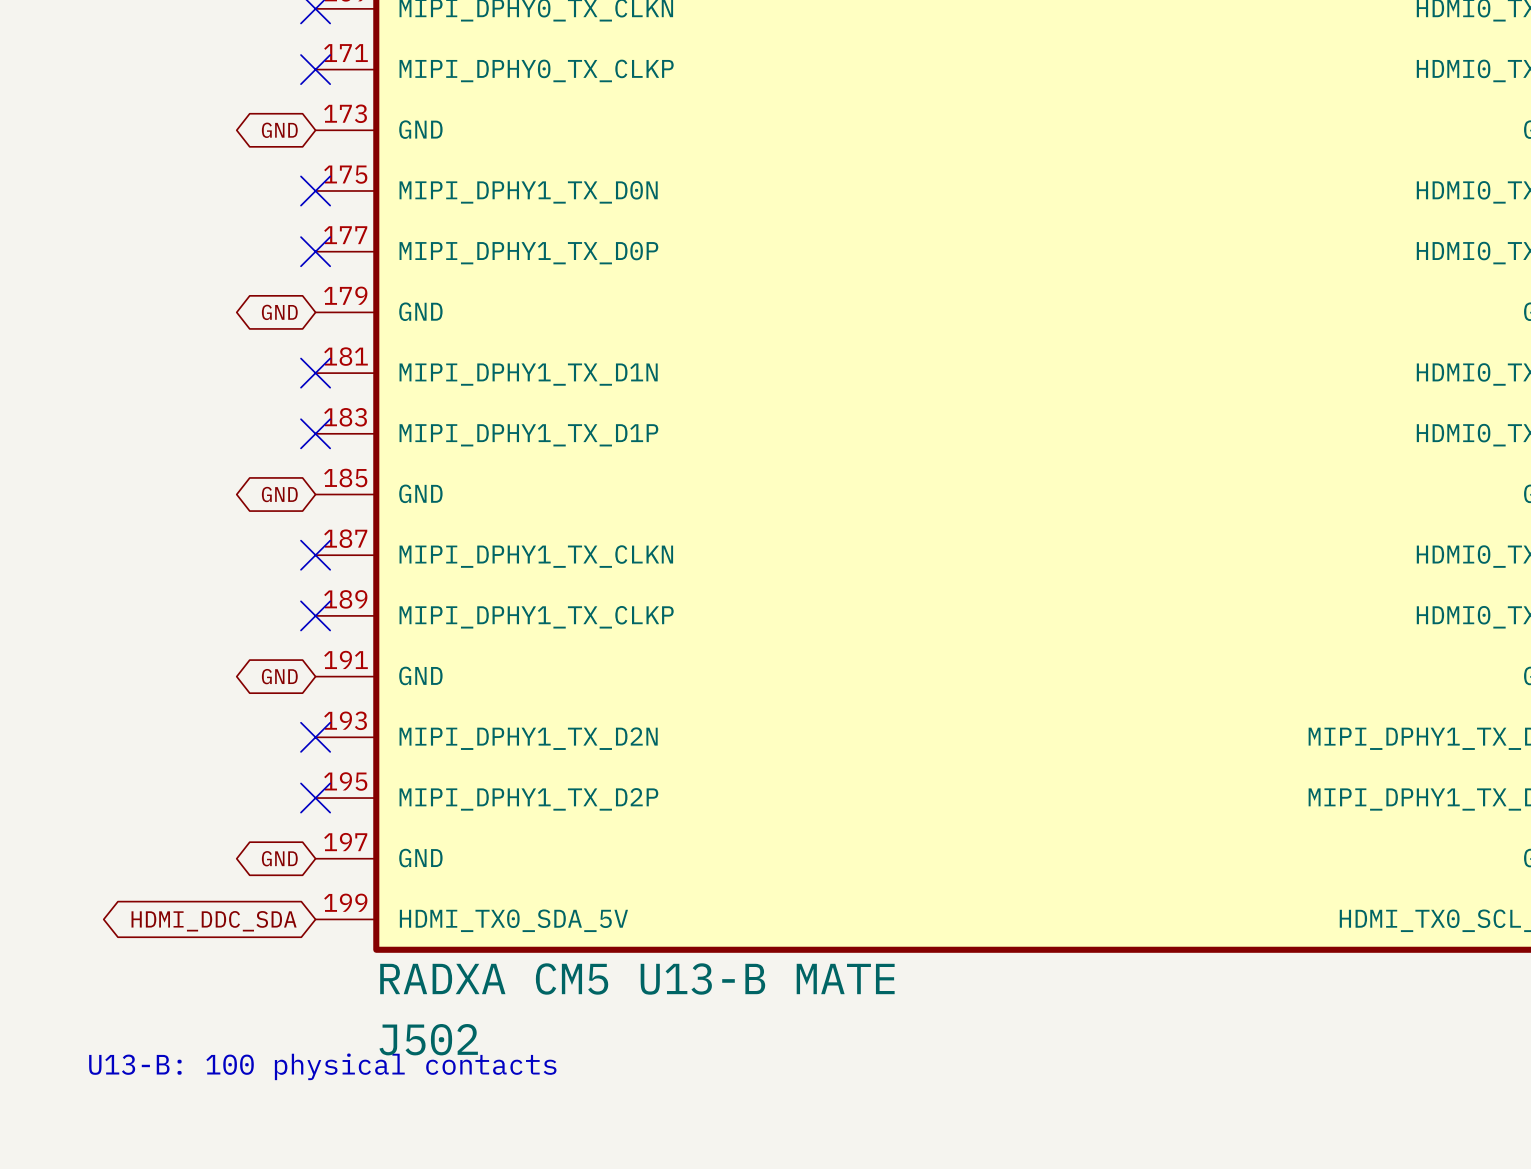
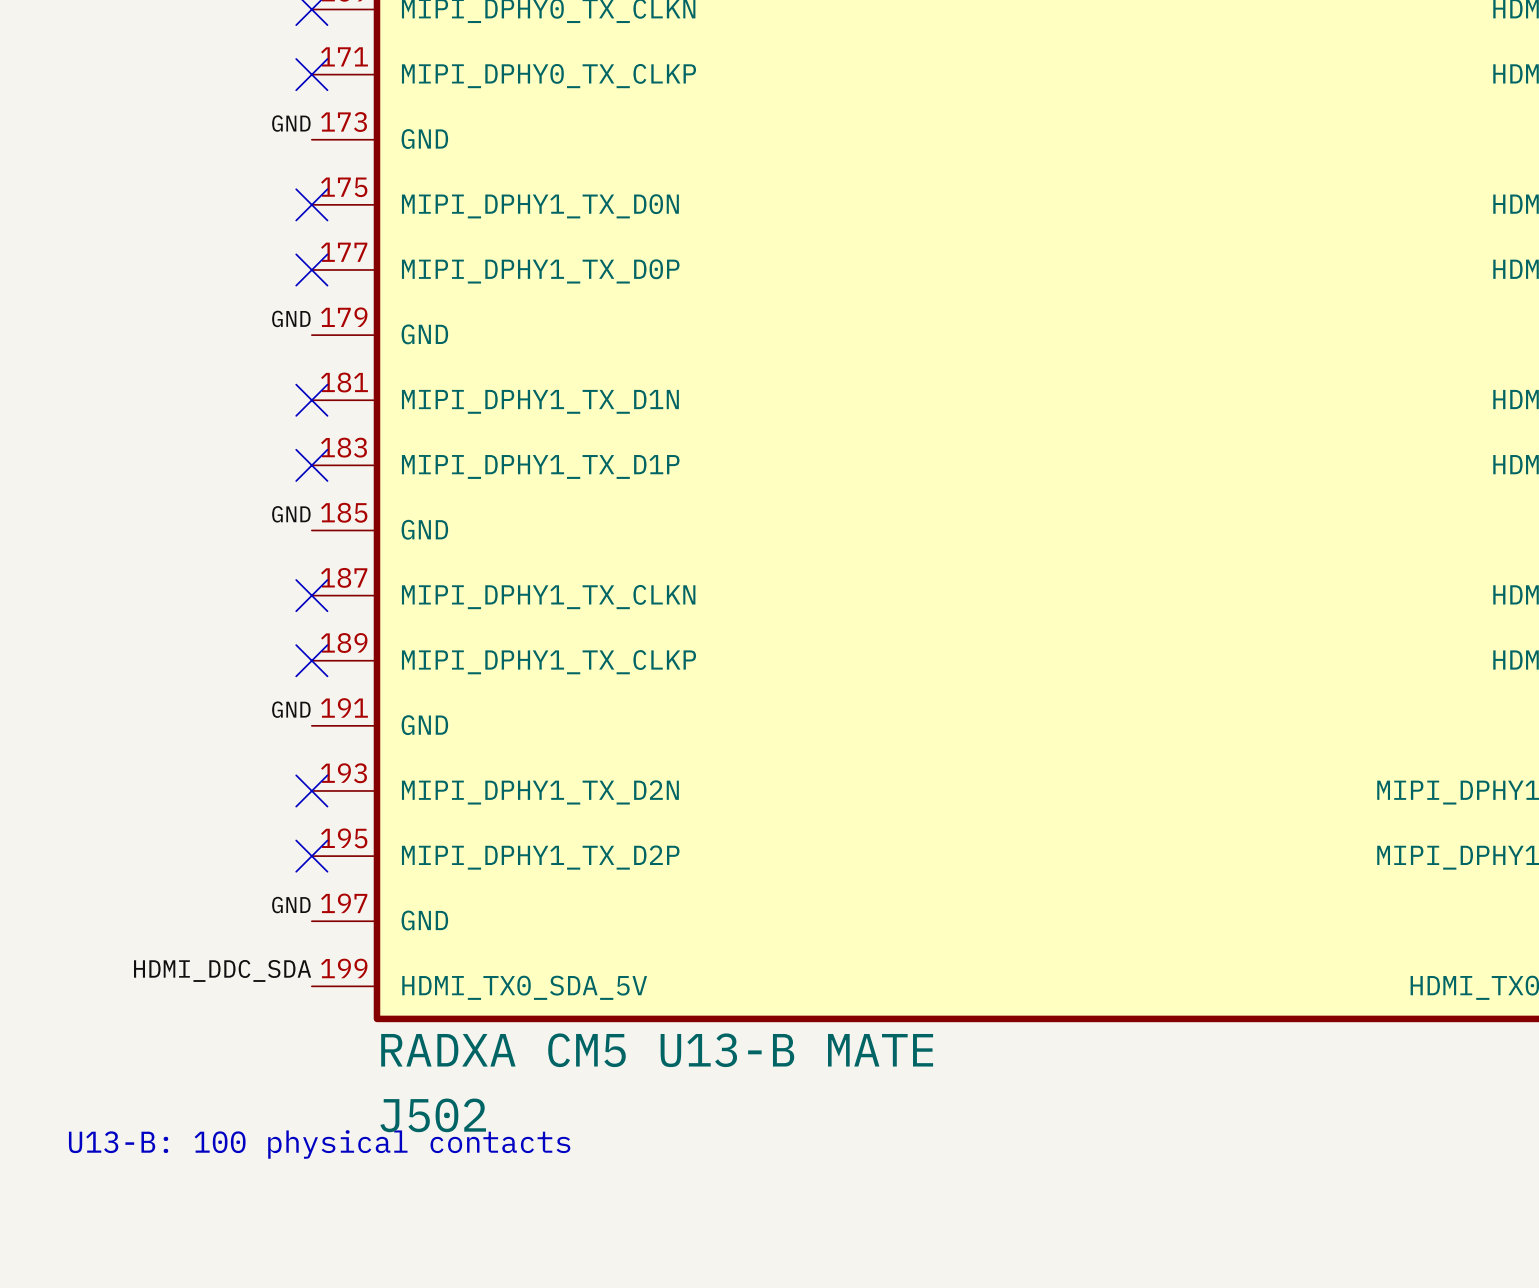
label: none -> GND (291, 123)
global label: GND (279, 130) -> none
label: none -> GND (291, 318)
global label: GND (279, 312) -> none
label: none -> GND (291, 514)
global label: GND (279, 494) -> none
label: none -> GND (291, 709)
global label: GND (279, 676) -> none
label: none -> GND (291, 905)
global label: GND (279, 858) -> none
label: none -> HDMI_DDC_SDA (222, 970)
global label: HDMI_DDC_SDA (214, 921) -> none

